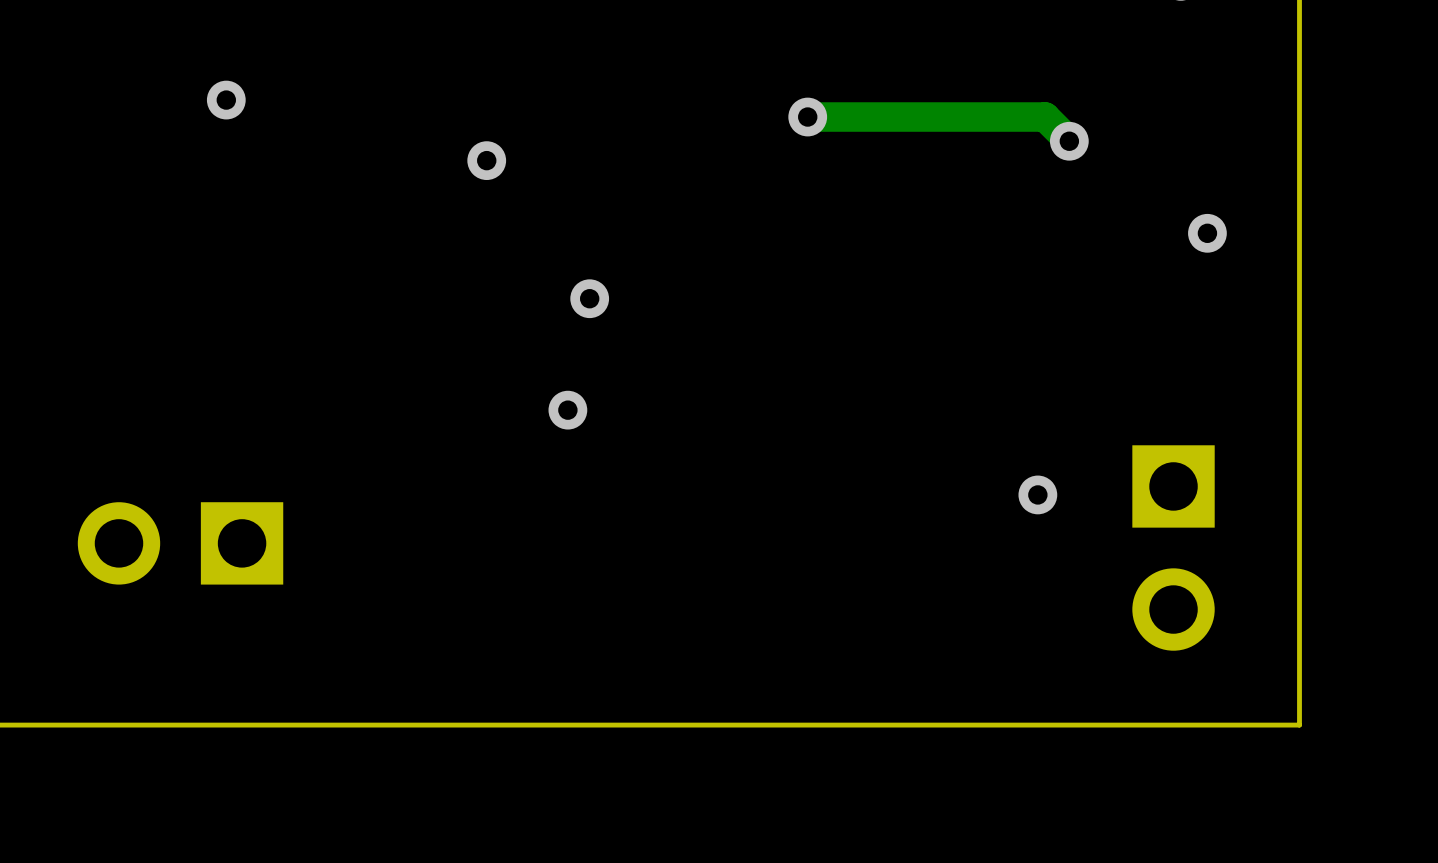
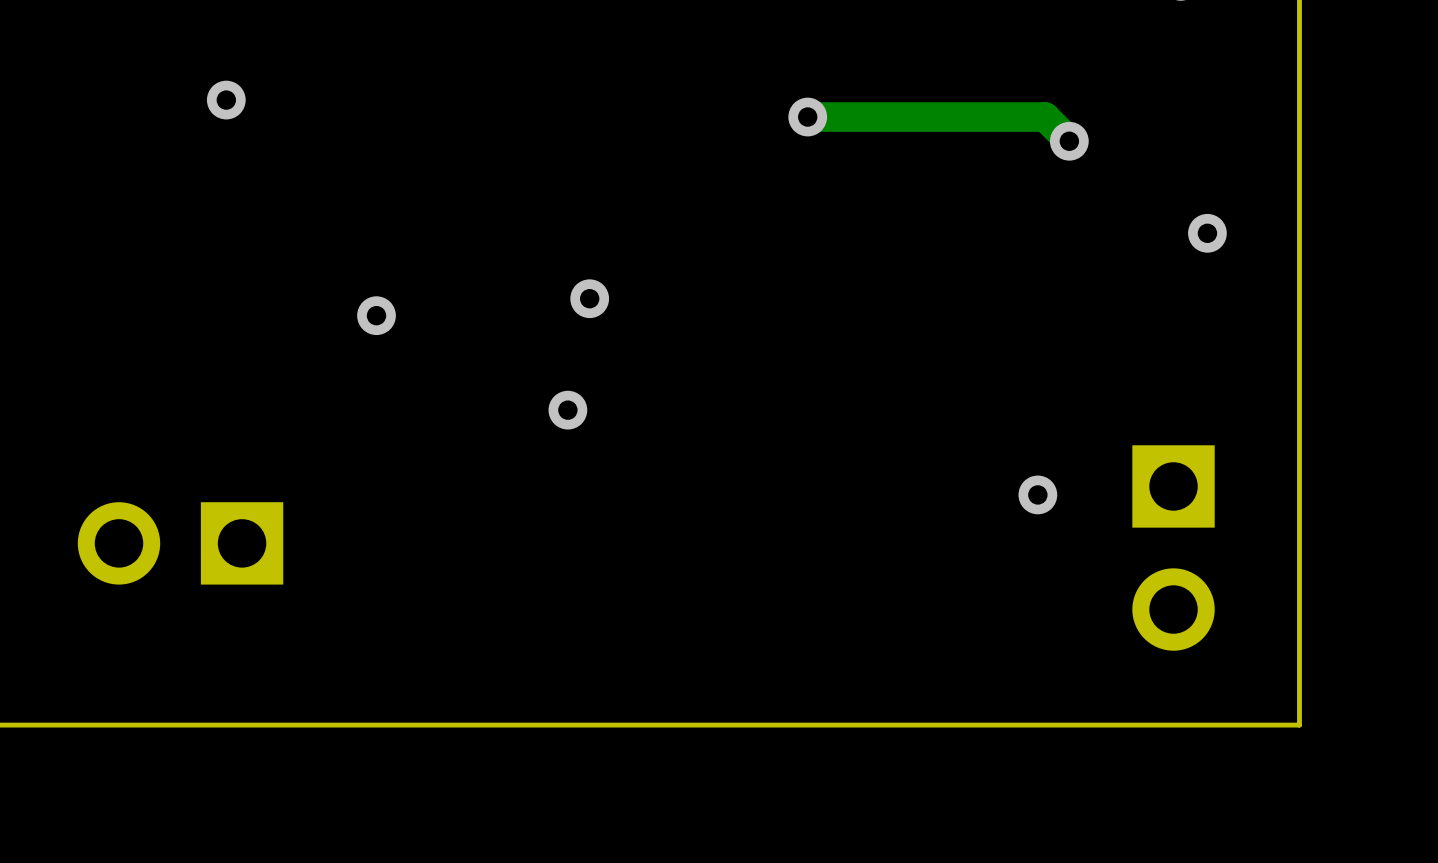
via position: (486, 160) -> (376, 315)

